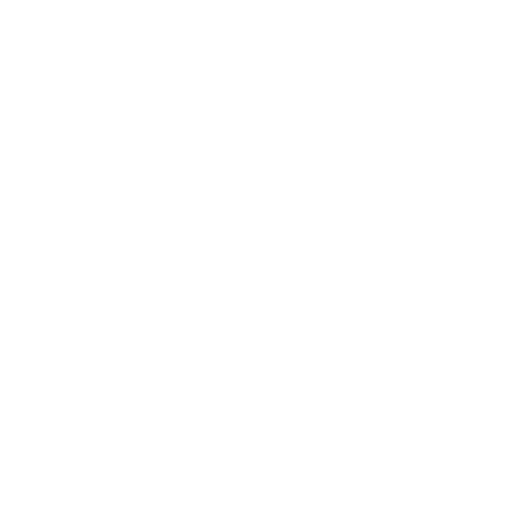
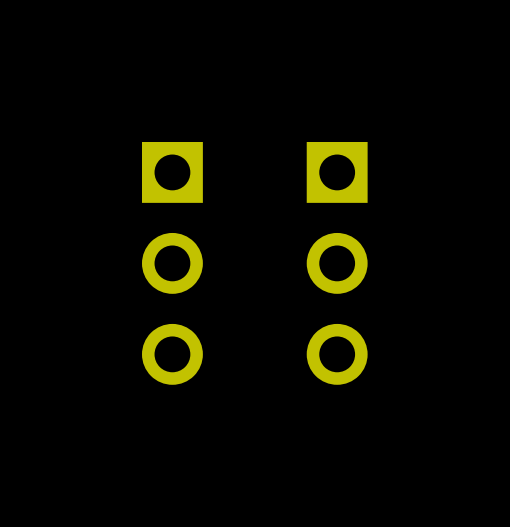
part: none -> (172, 263)
part: none -> (337, 263)

